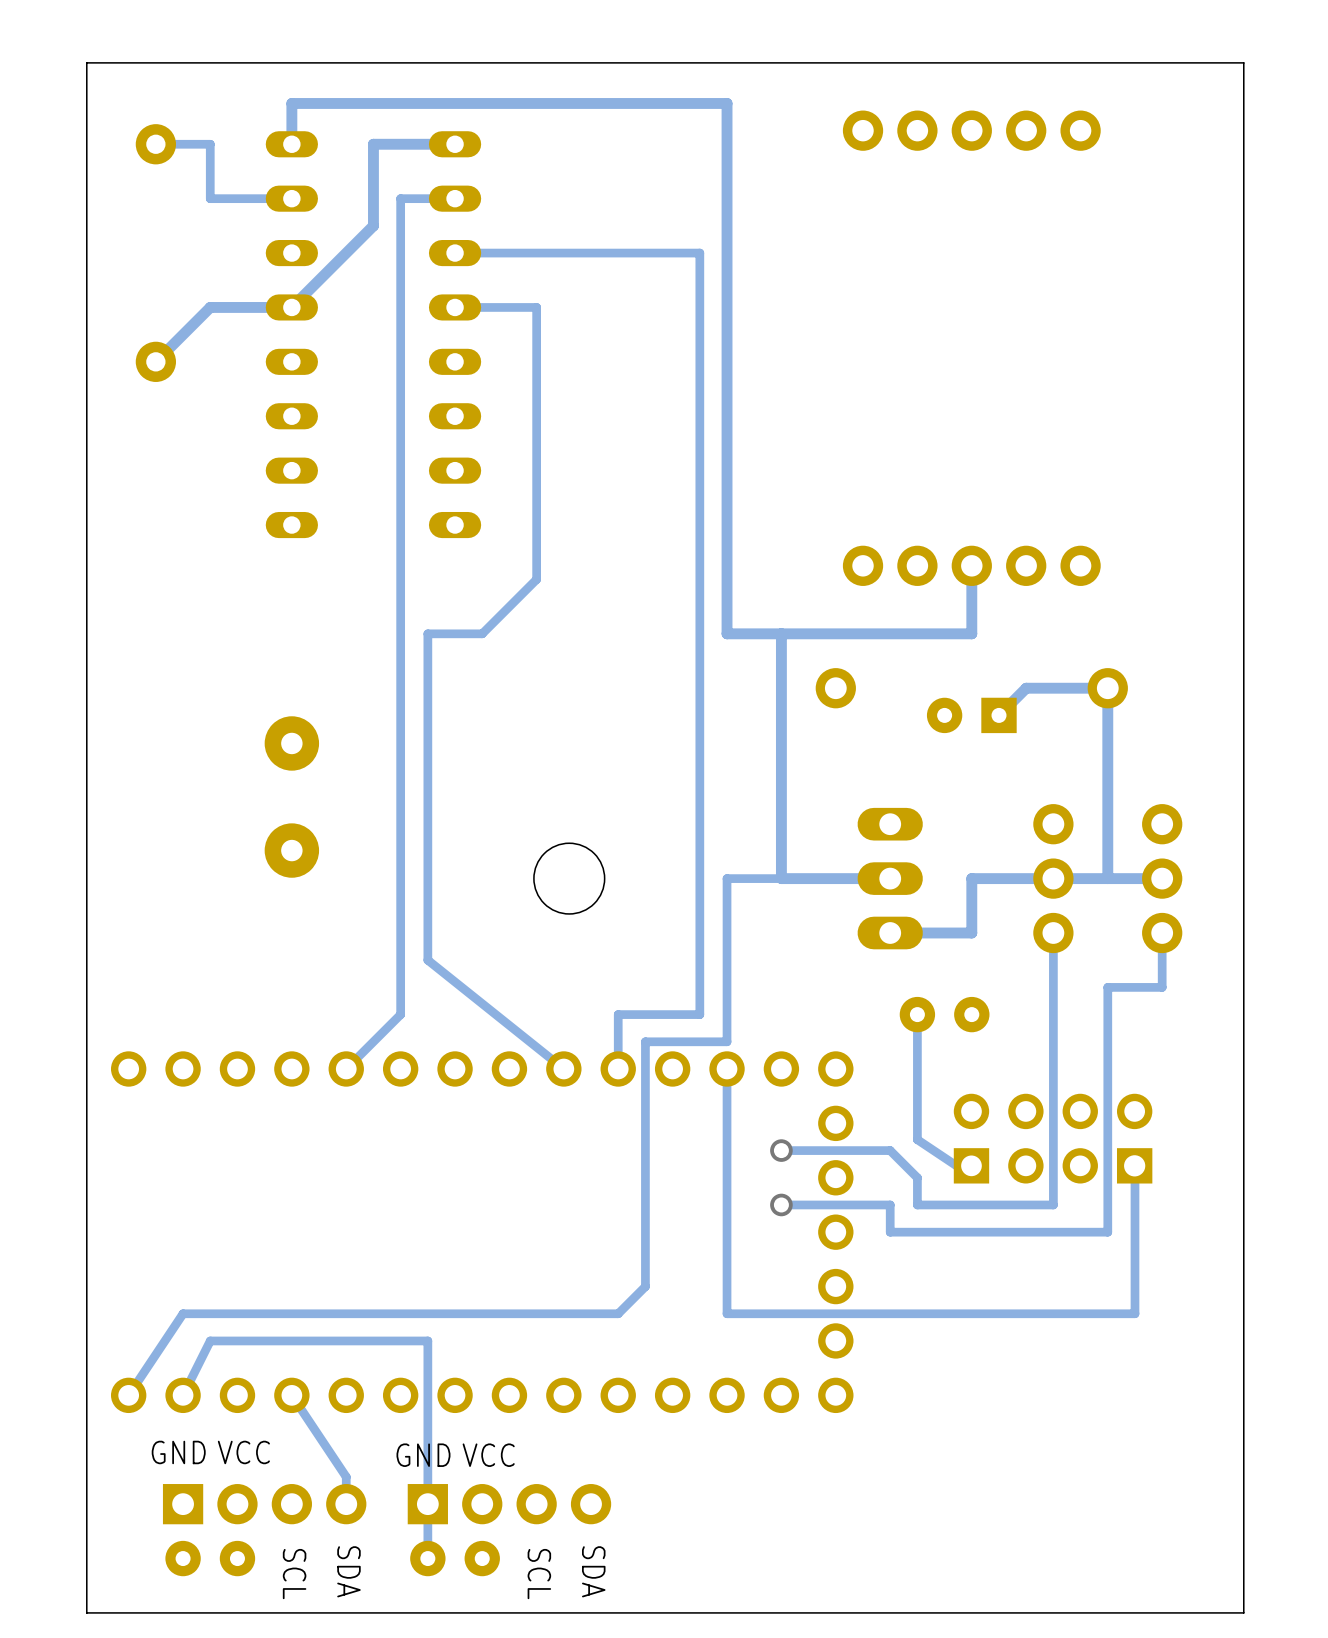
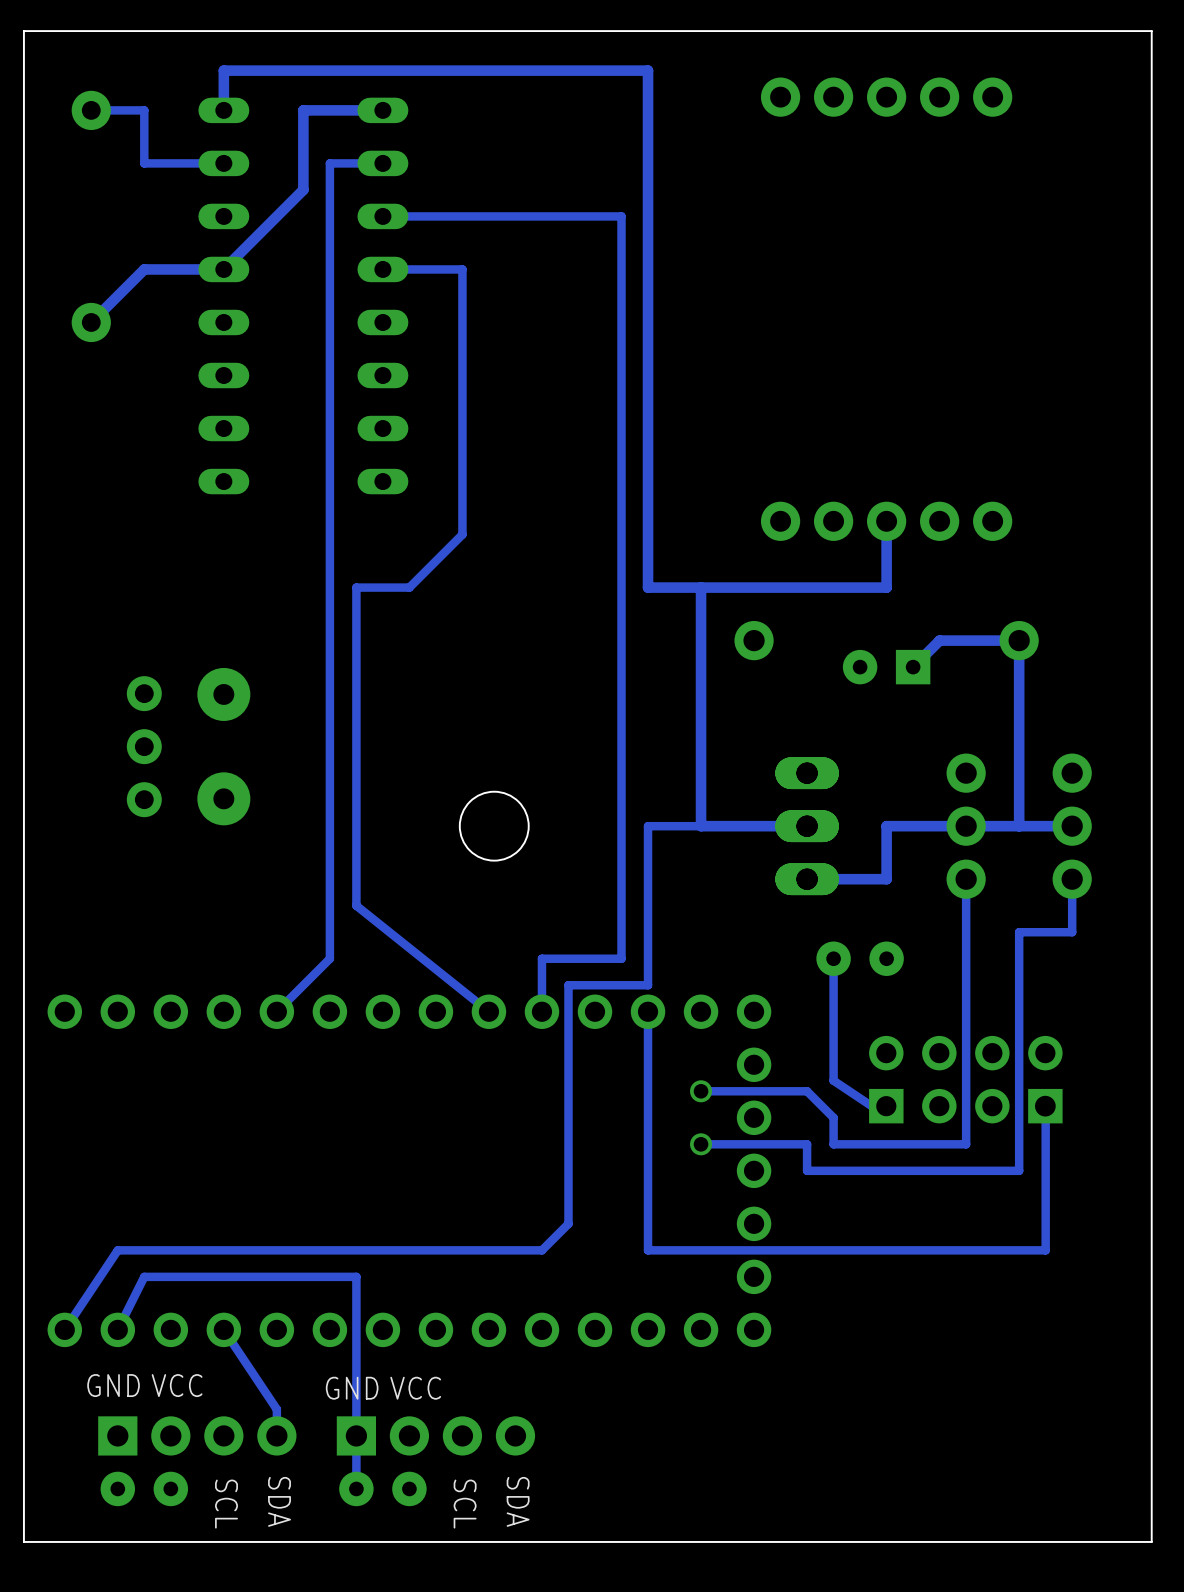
part: none -> (144, 746)
part: none -> (807, 826)

